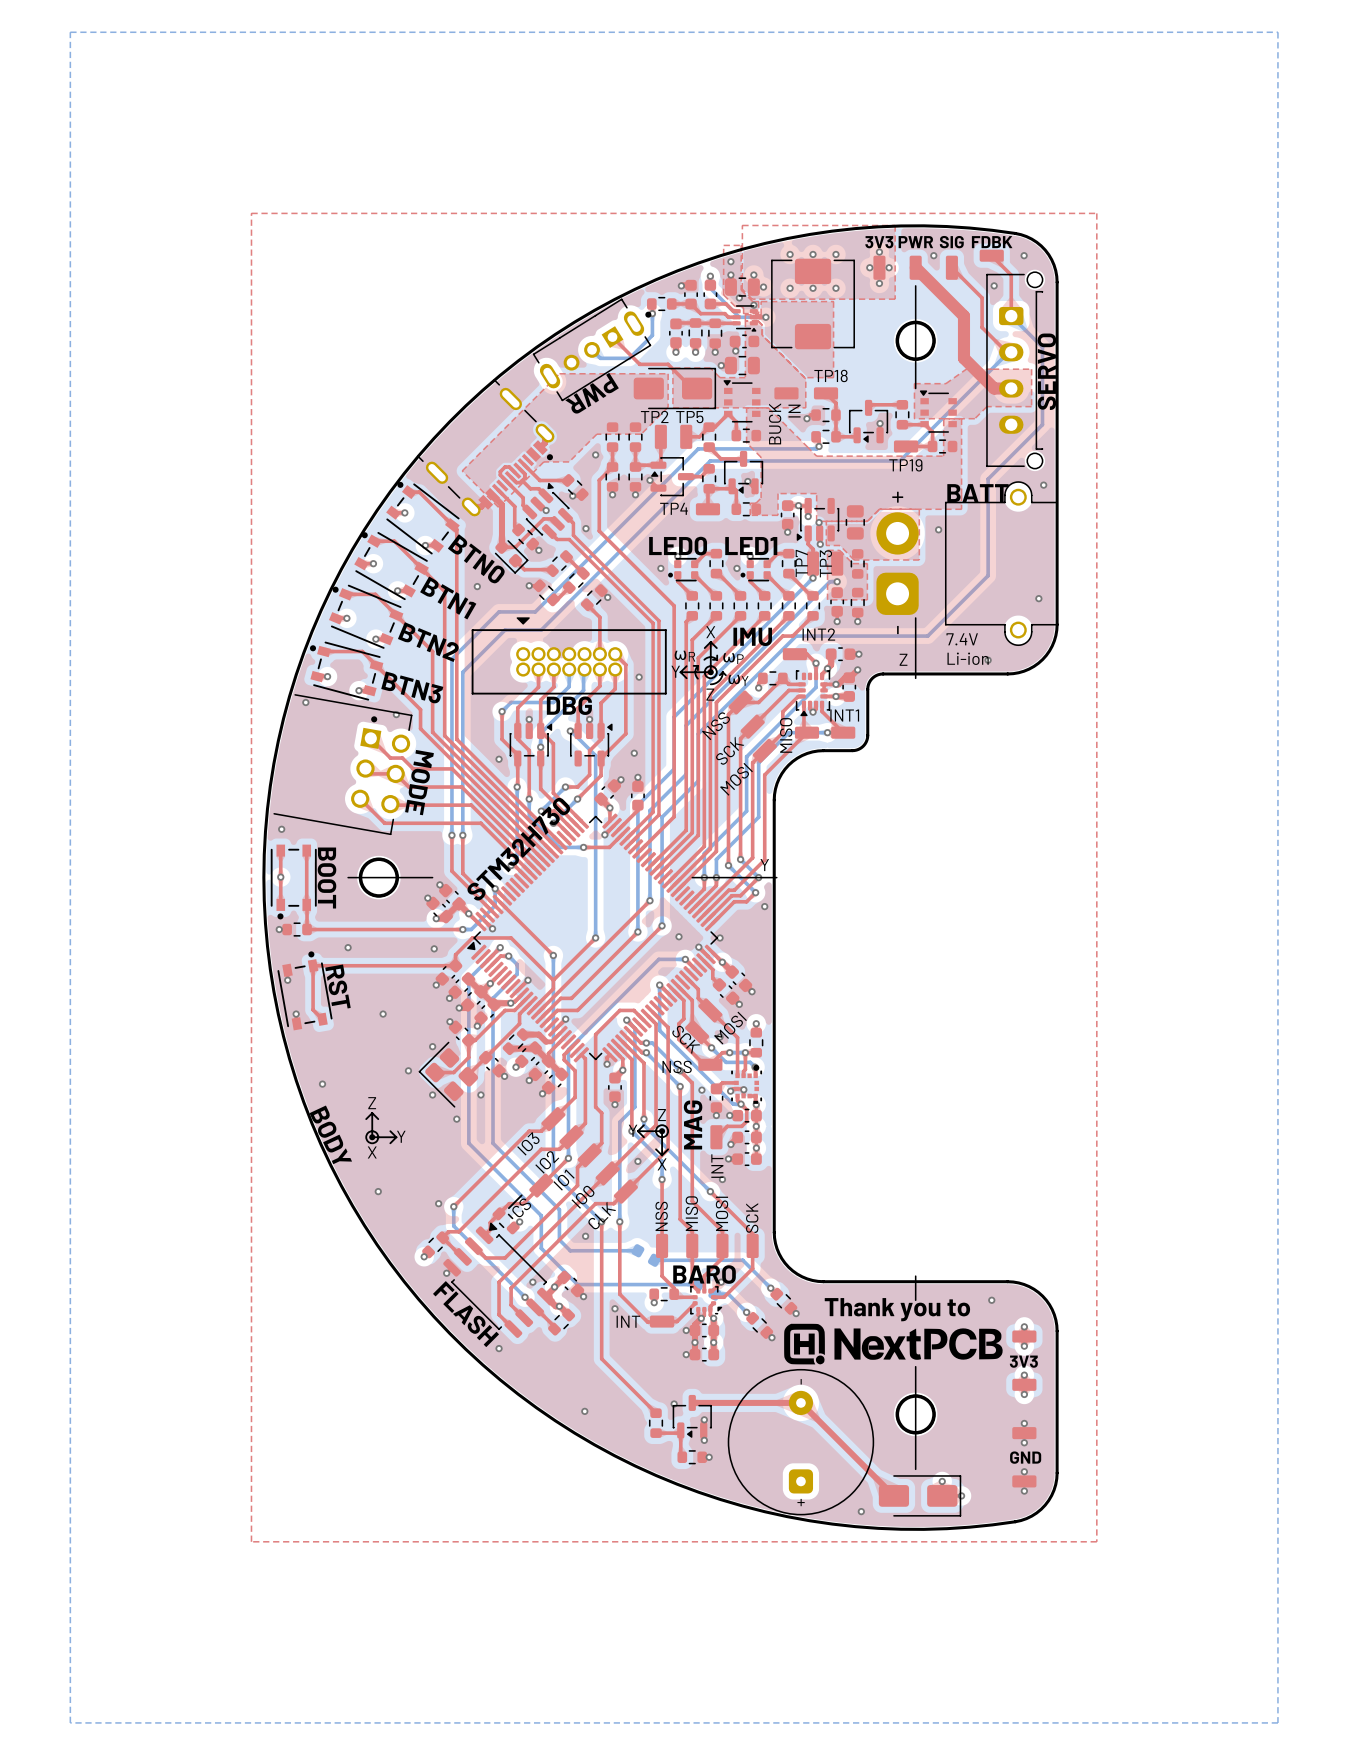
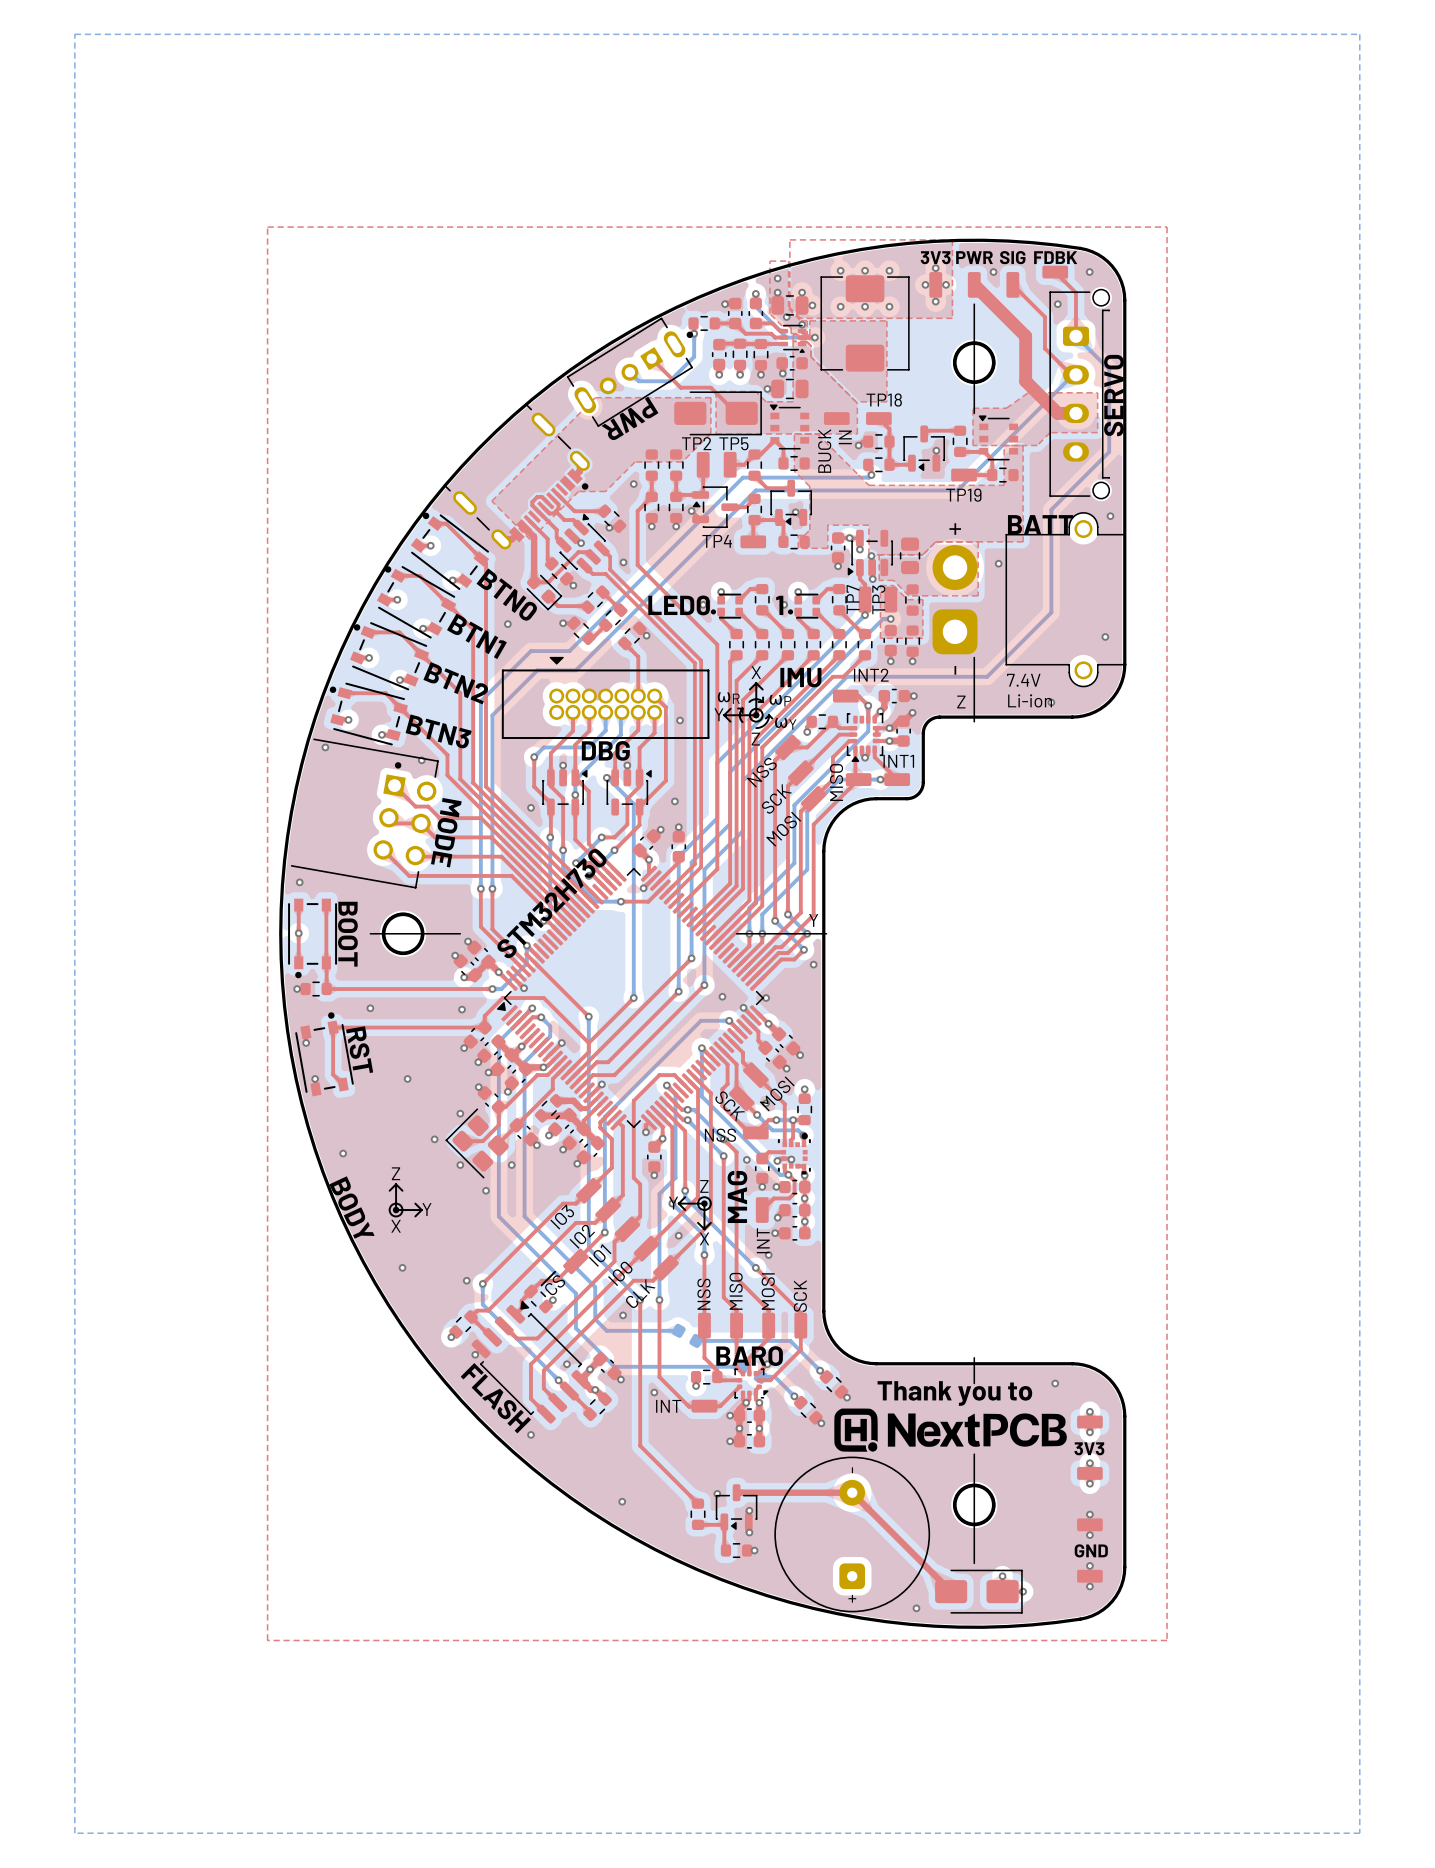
text position: LED0 (678, 546) -> LED0 (679, 605)
text: LED1 (751, 546) -> none
text: none -> 1 (779, 605)

